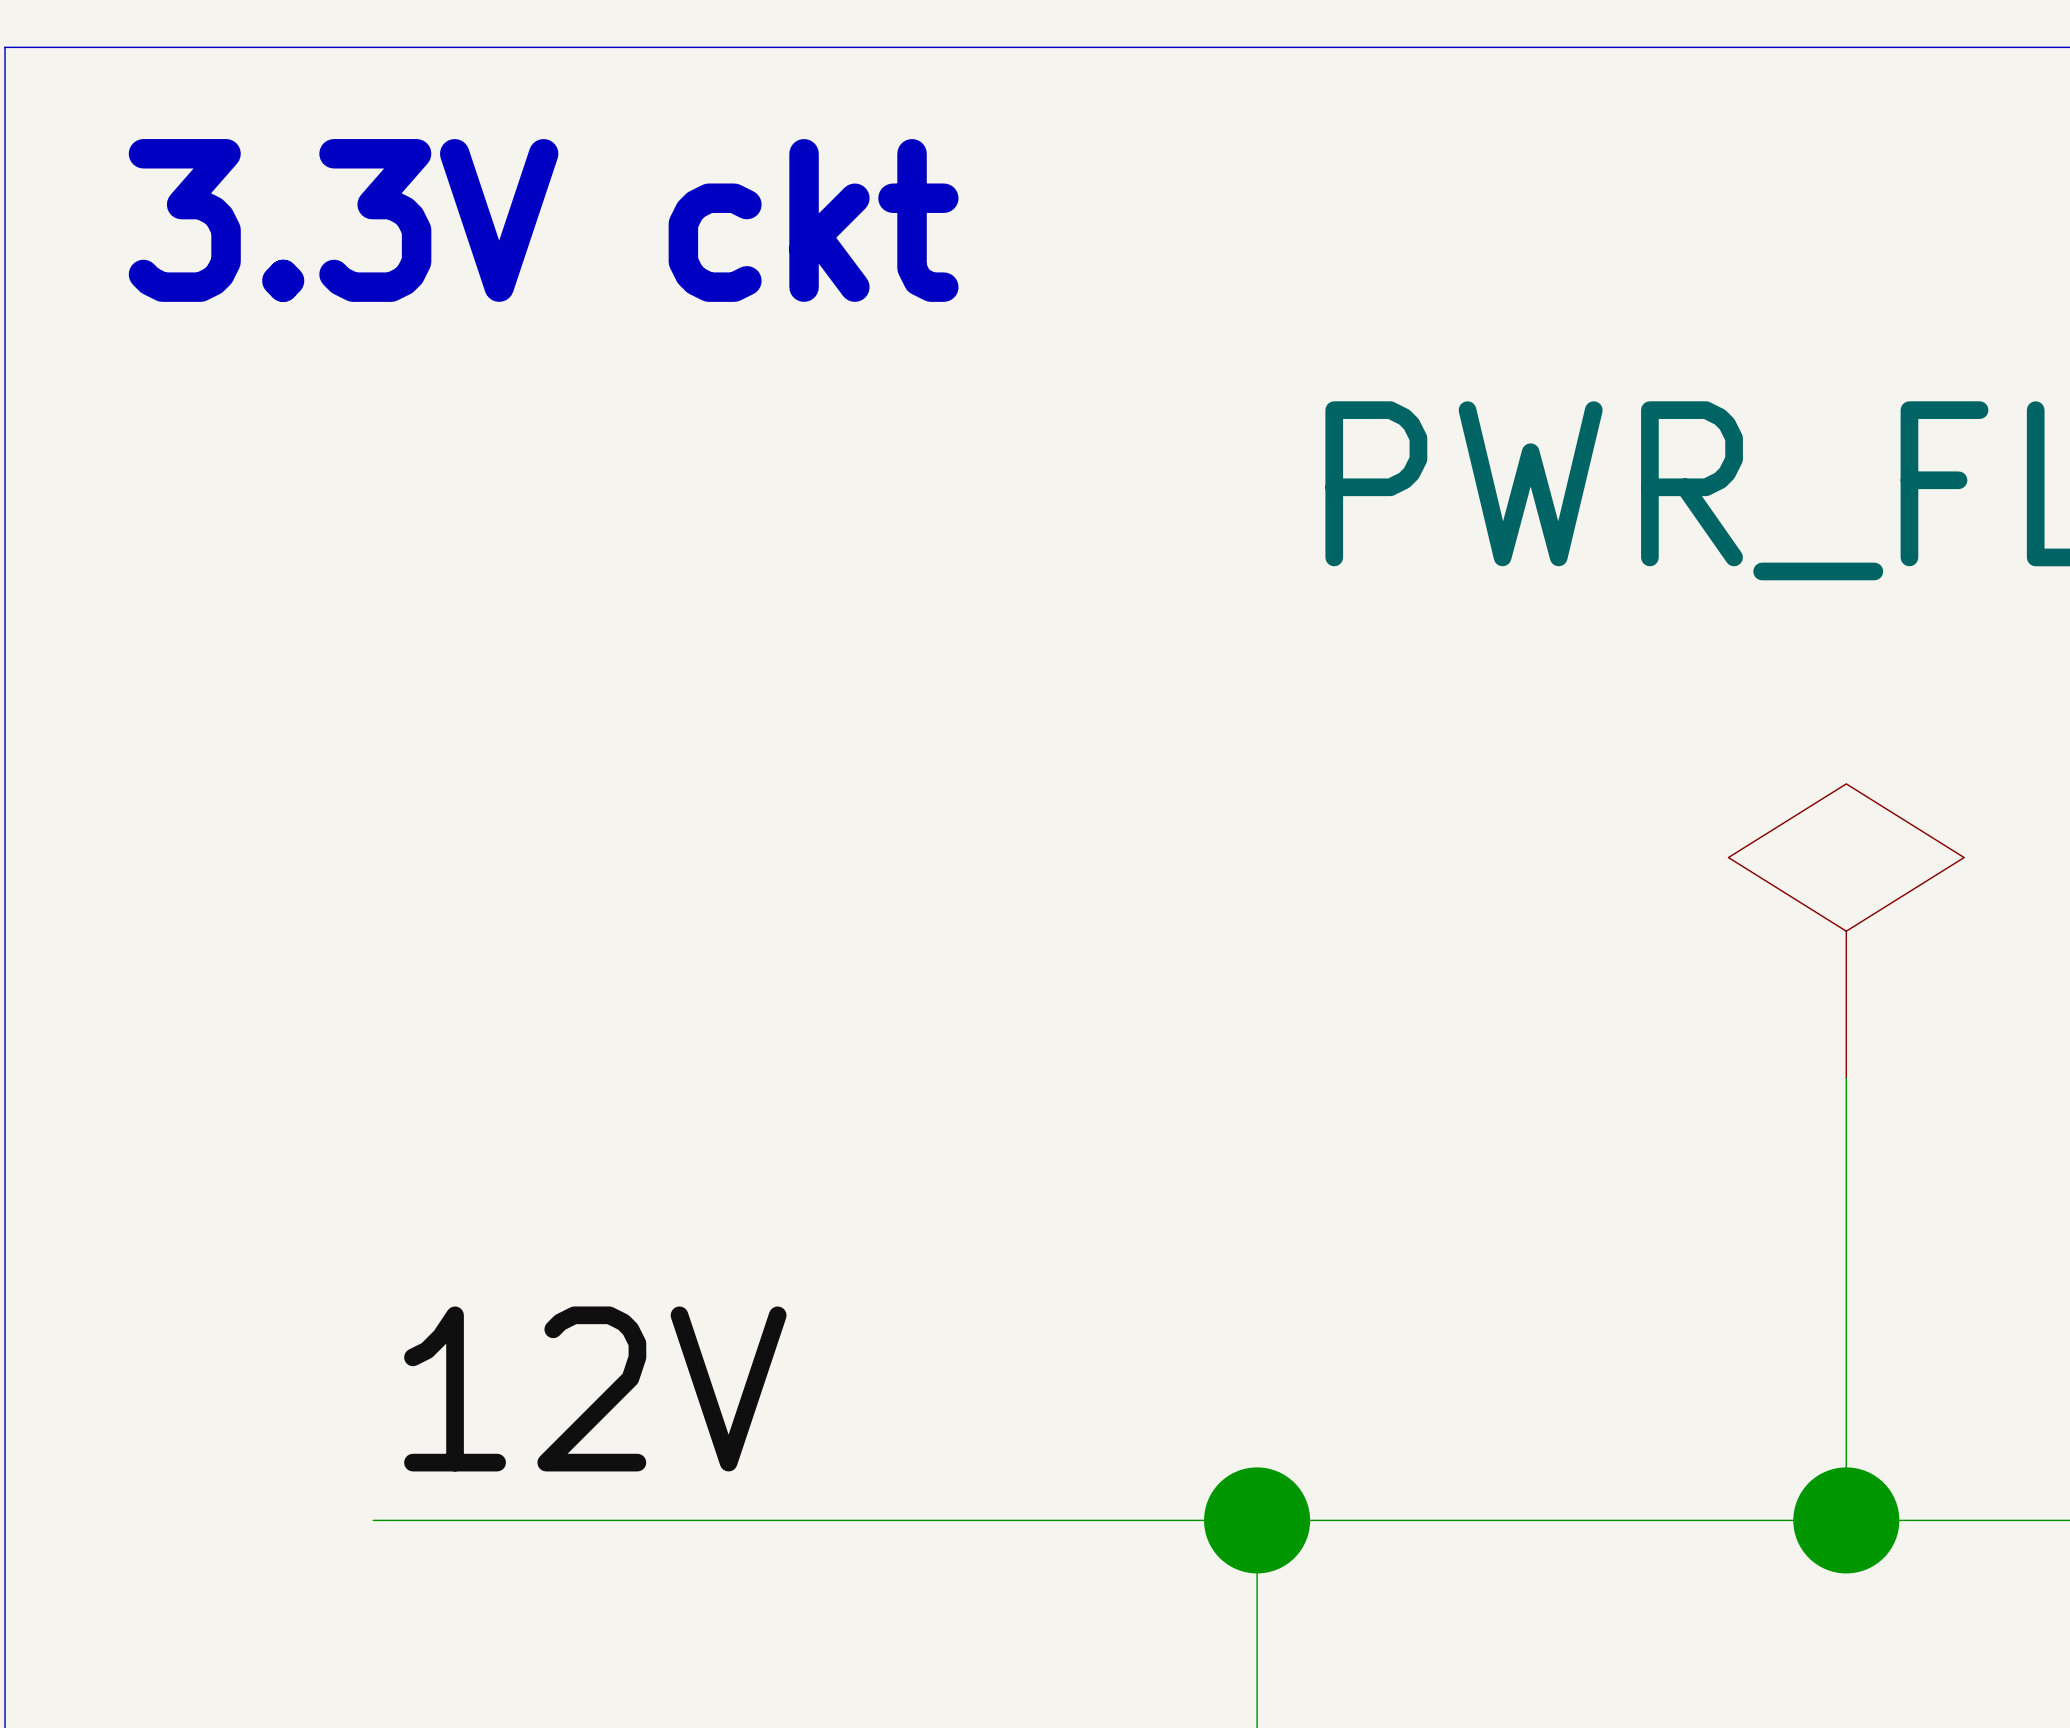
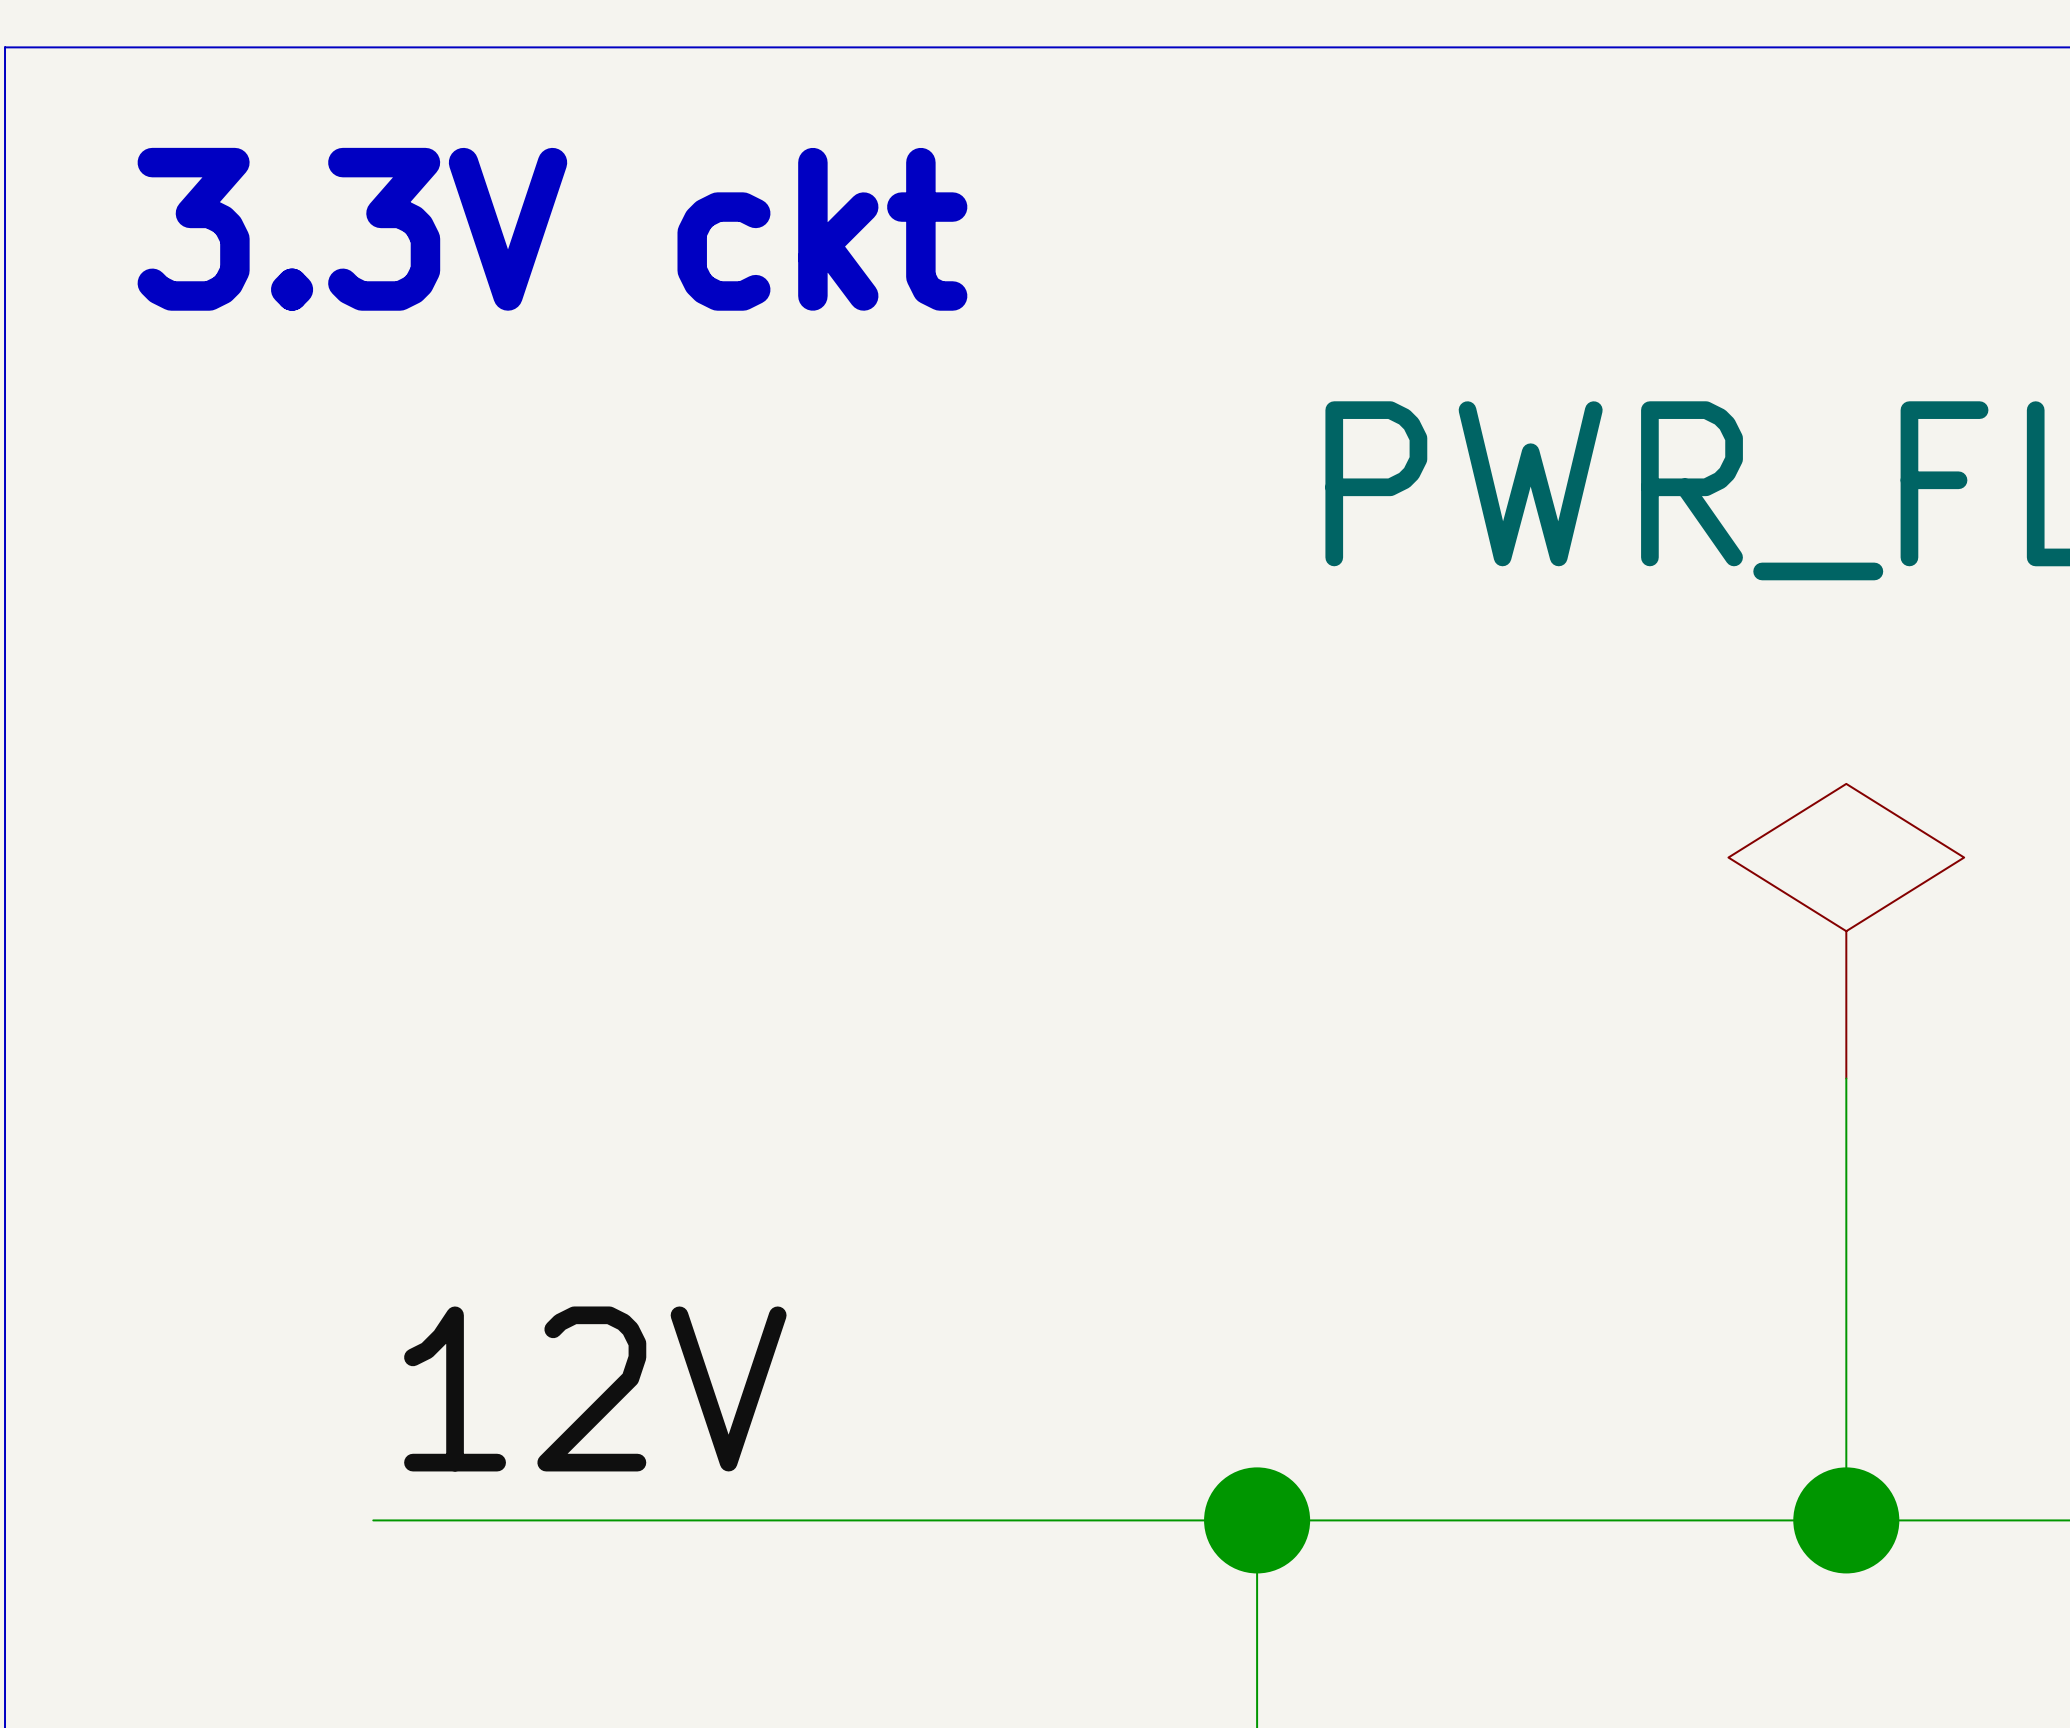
text position: 3.3V ckt (543, 220) -> 3.3V ckt (552, 229)

